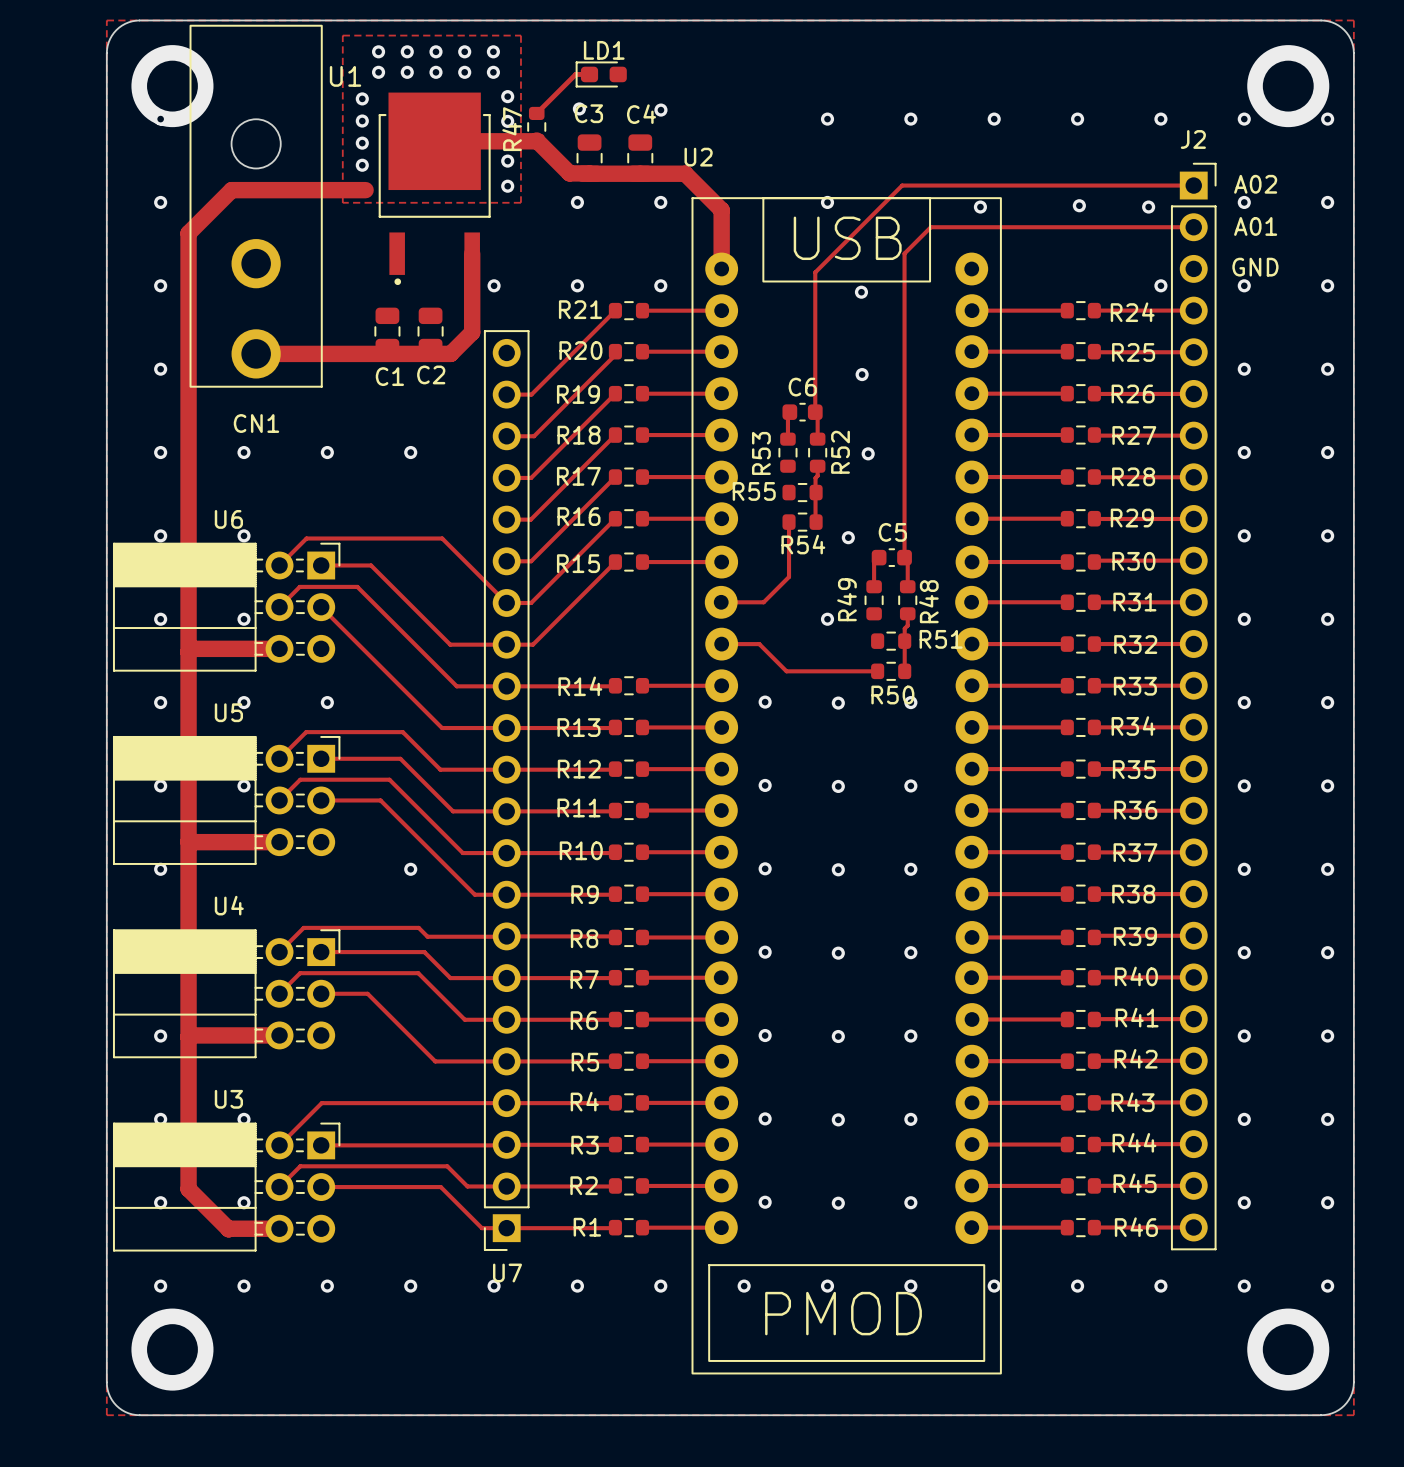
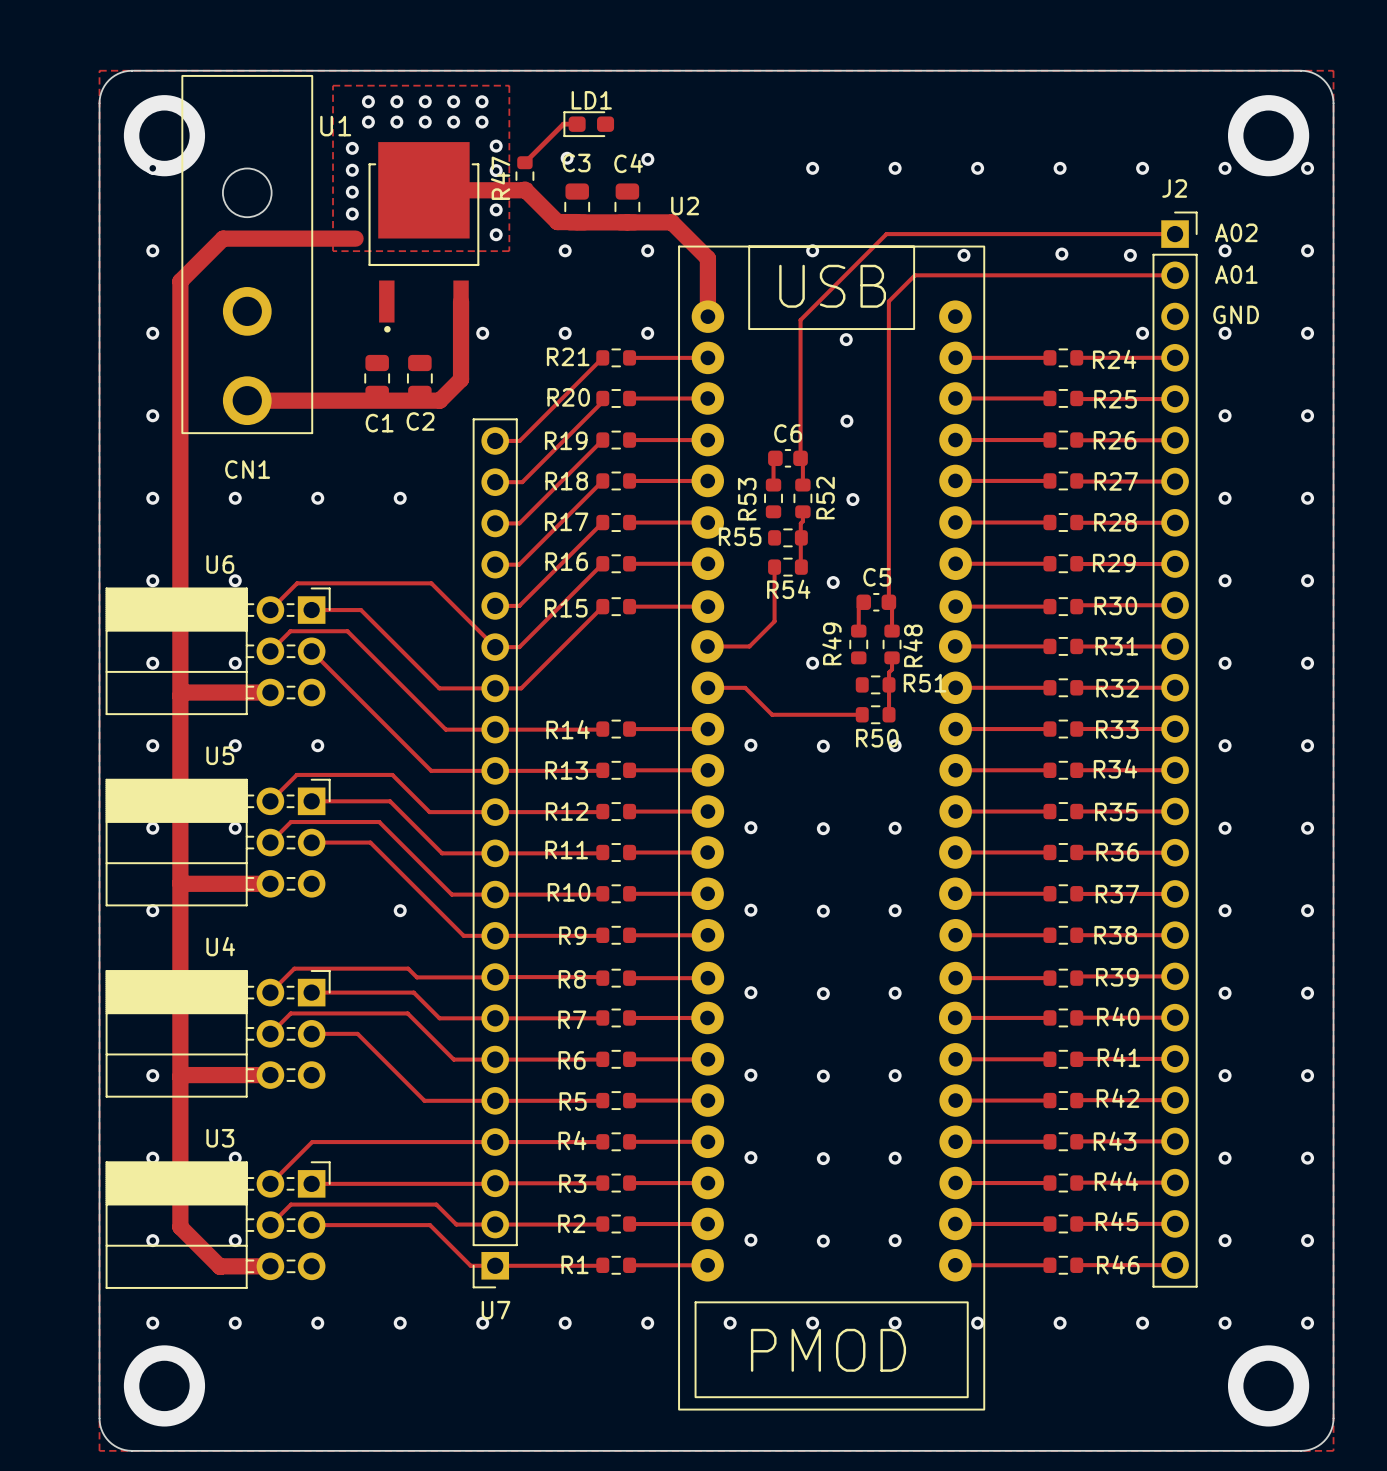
U7 footprint: [483, 330, 530, 1251] -> [472, 418, 518, 1289]

